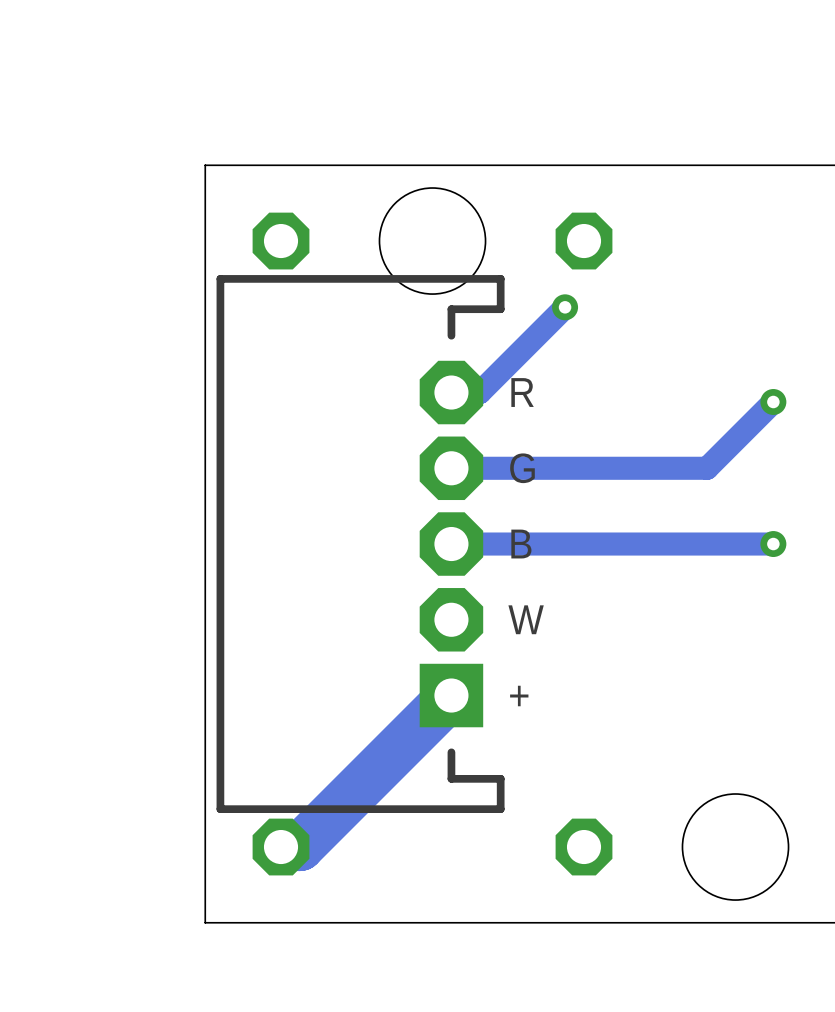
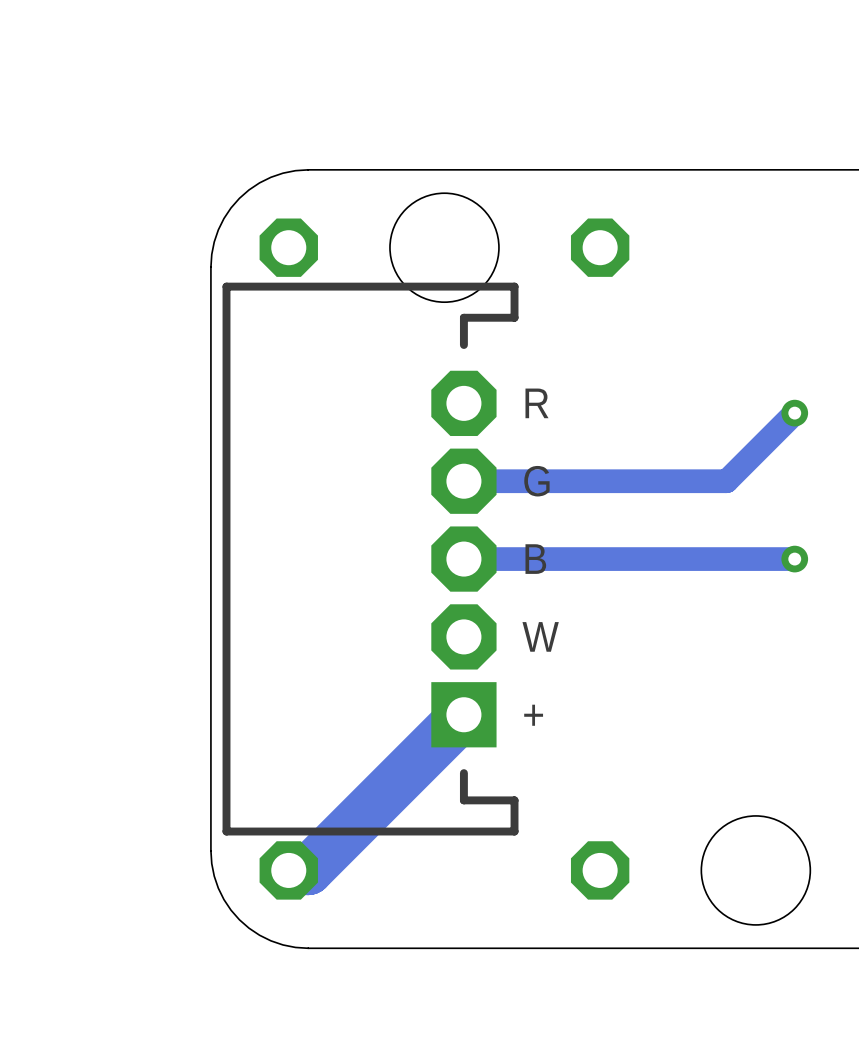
board edge: (299, 165) (205, 165) (205, 259) -> (308, 169) (295, 170) (271, 177) (259, 182) (239, 198) (223, 218) (218, 229) (211, 254) (210, 267)
track: (565, 307) (479, 392) (451, 392) -> none
via: (565, 307) -> none
board edge: (205, 828) (205, 922) (299, 922) -> (210, 850) (211, 863) (218, 888) (223, 899) (239, 919) (259, 935) (271, 940) (295, 947) (308, 948)

